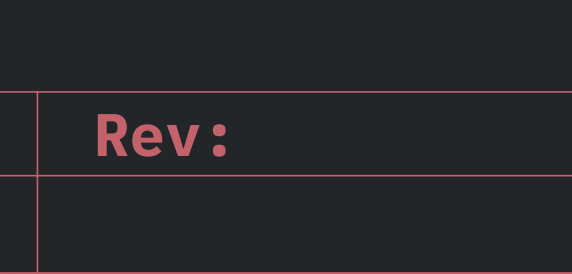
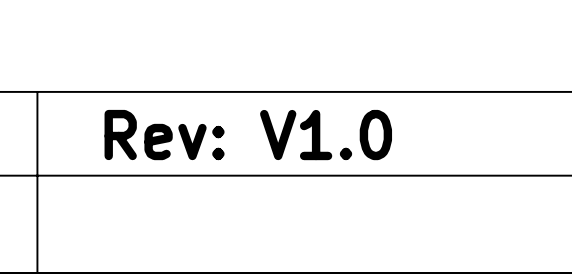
title block: Rev: (161, 135) -> Rev: V1.0 (248, 135)

